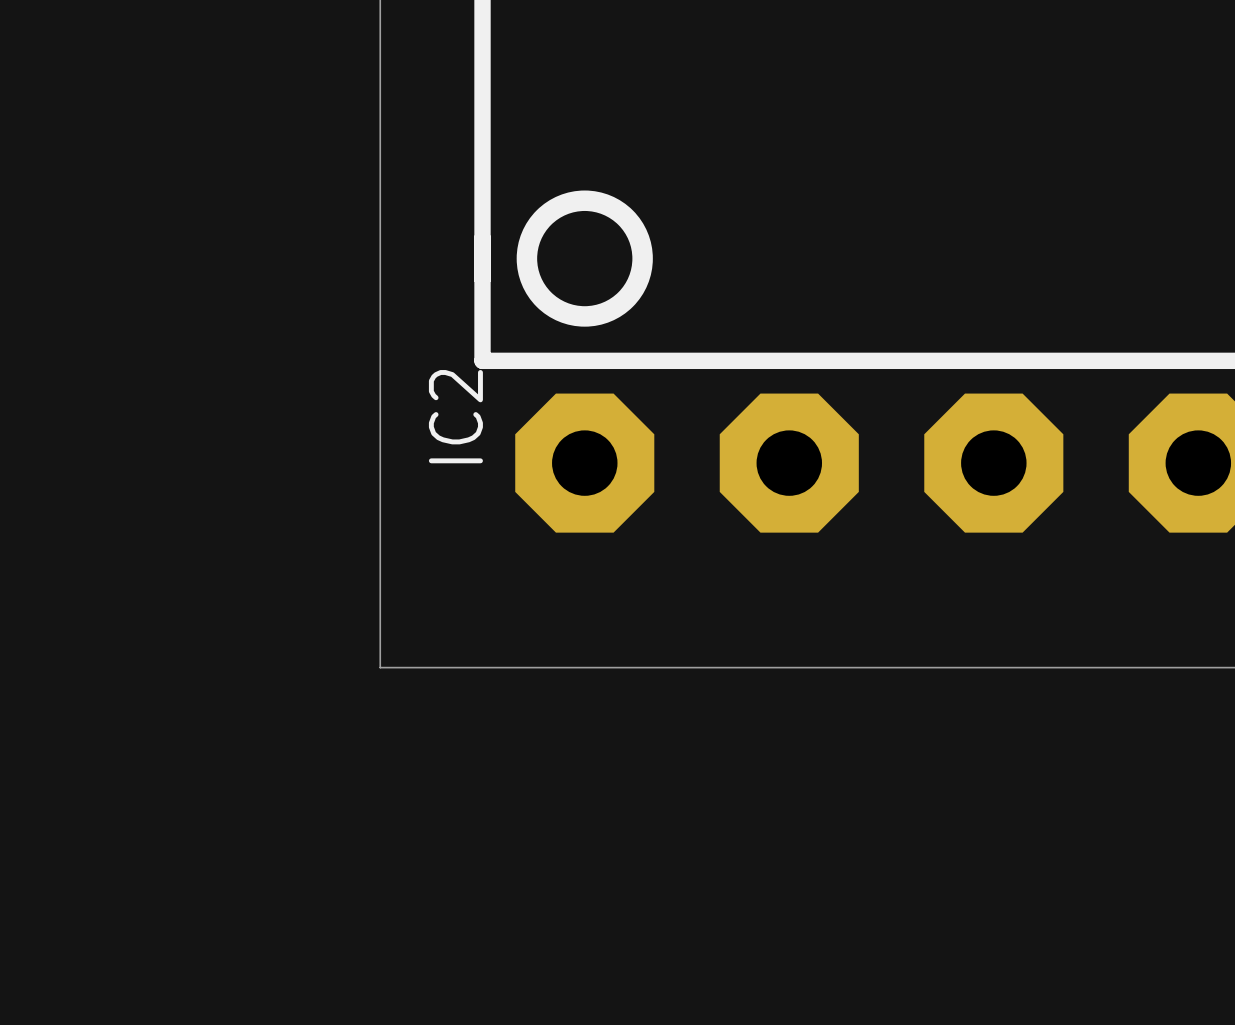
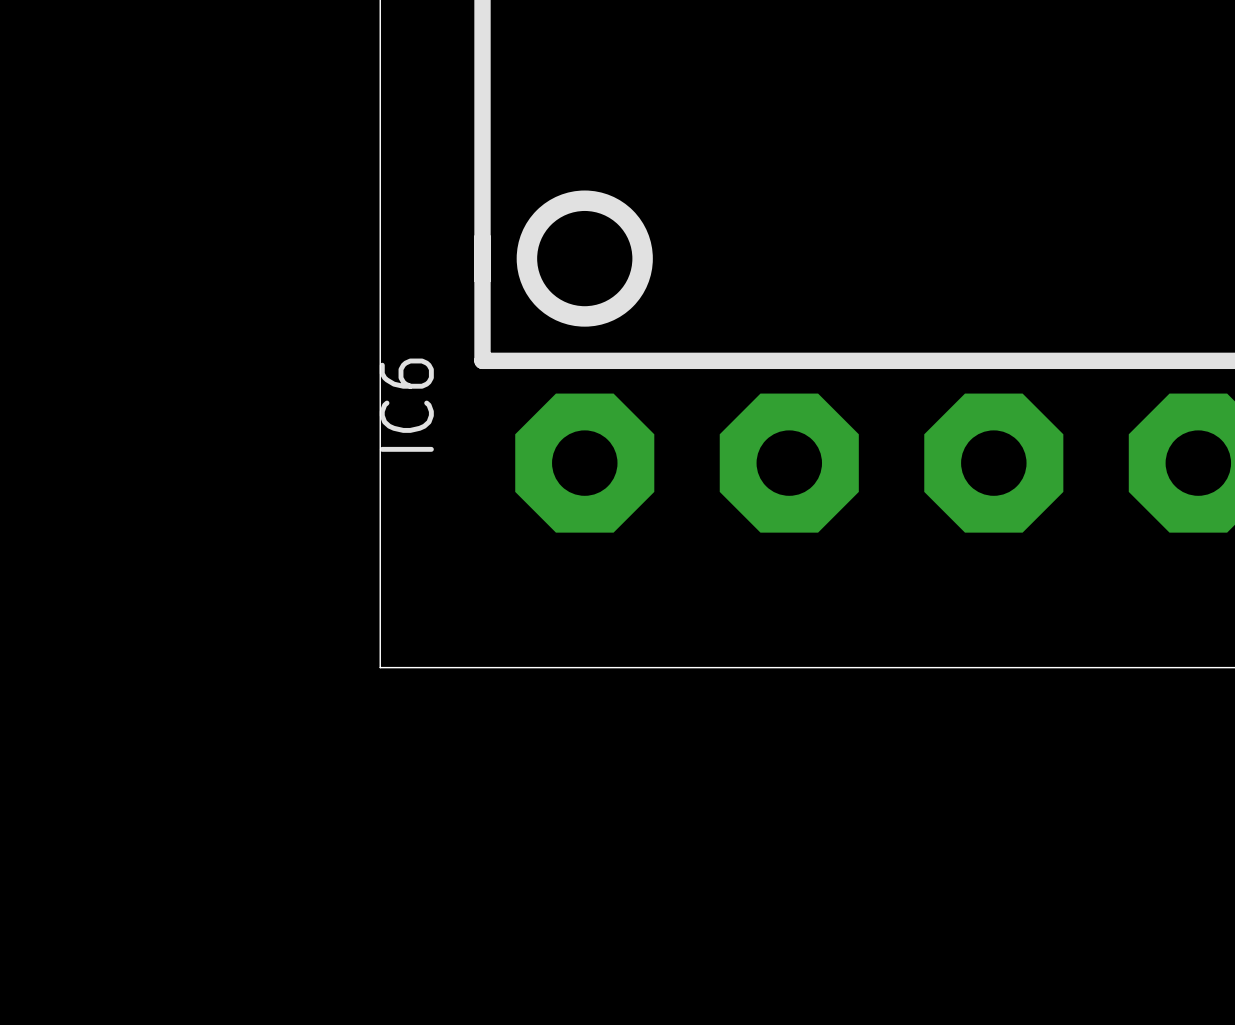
IC2 name: IC2 (455, 416) -> IC6 (406, 405)

